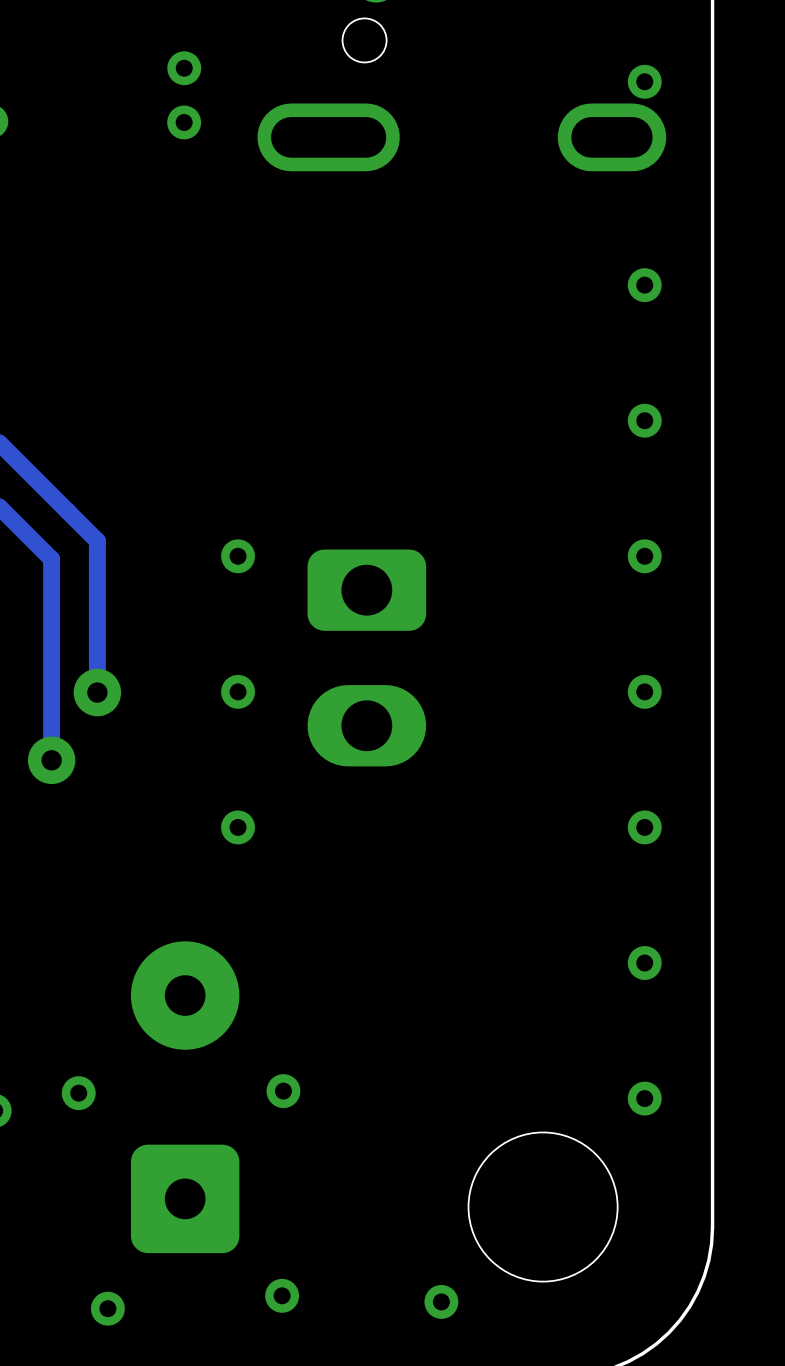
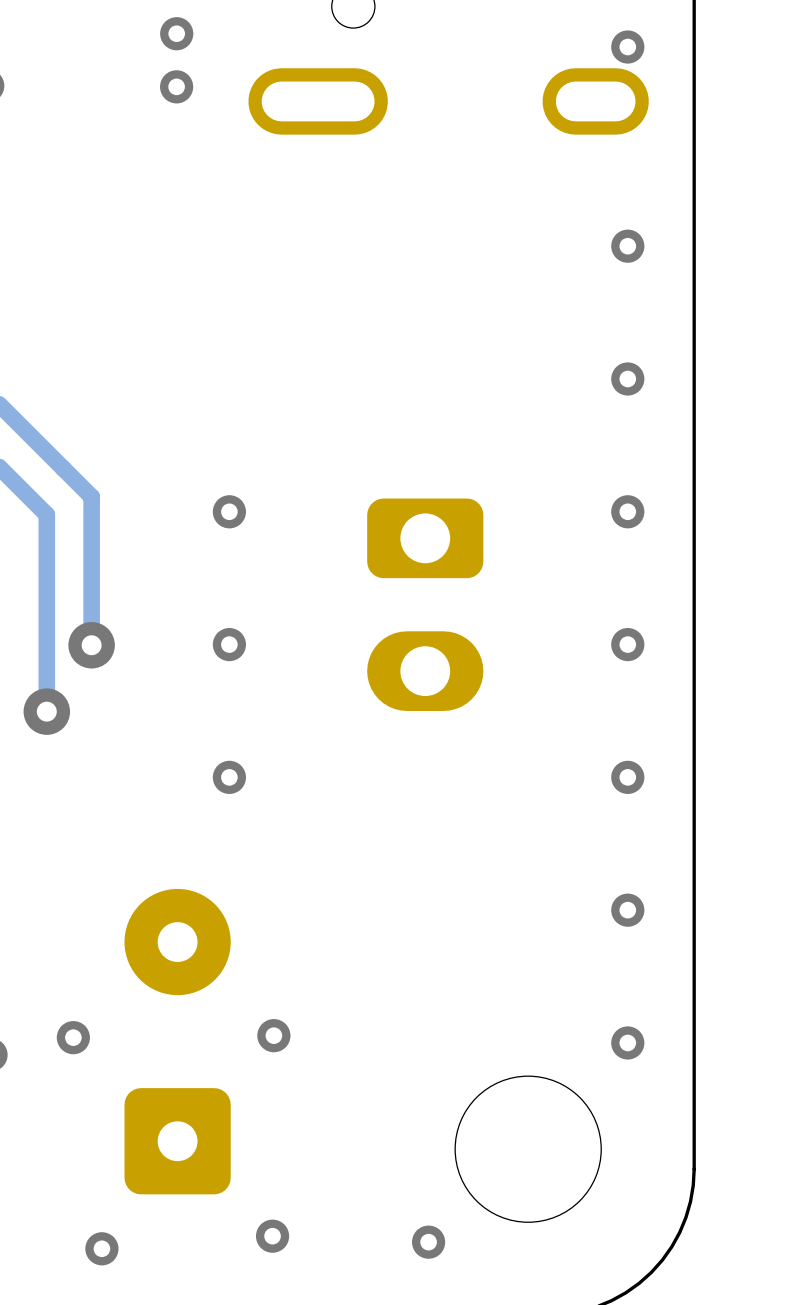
part position: (366, 657) -> (425, 604)

